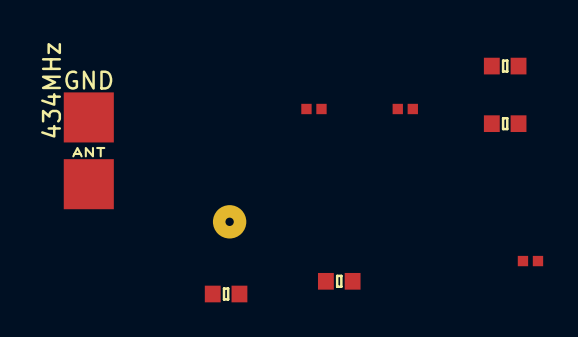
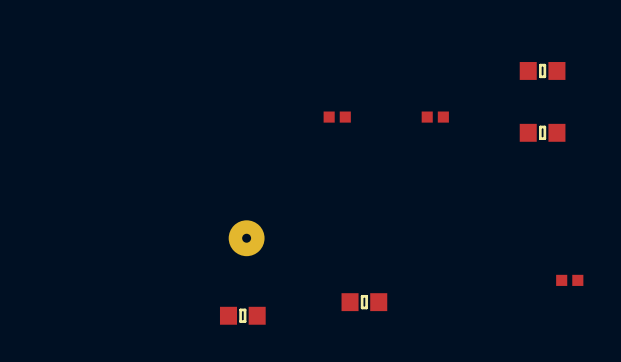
part: 434MHz (88, 150) -> none

